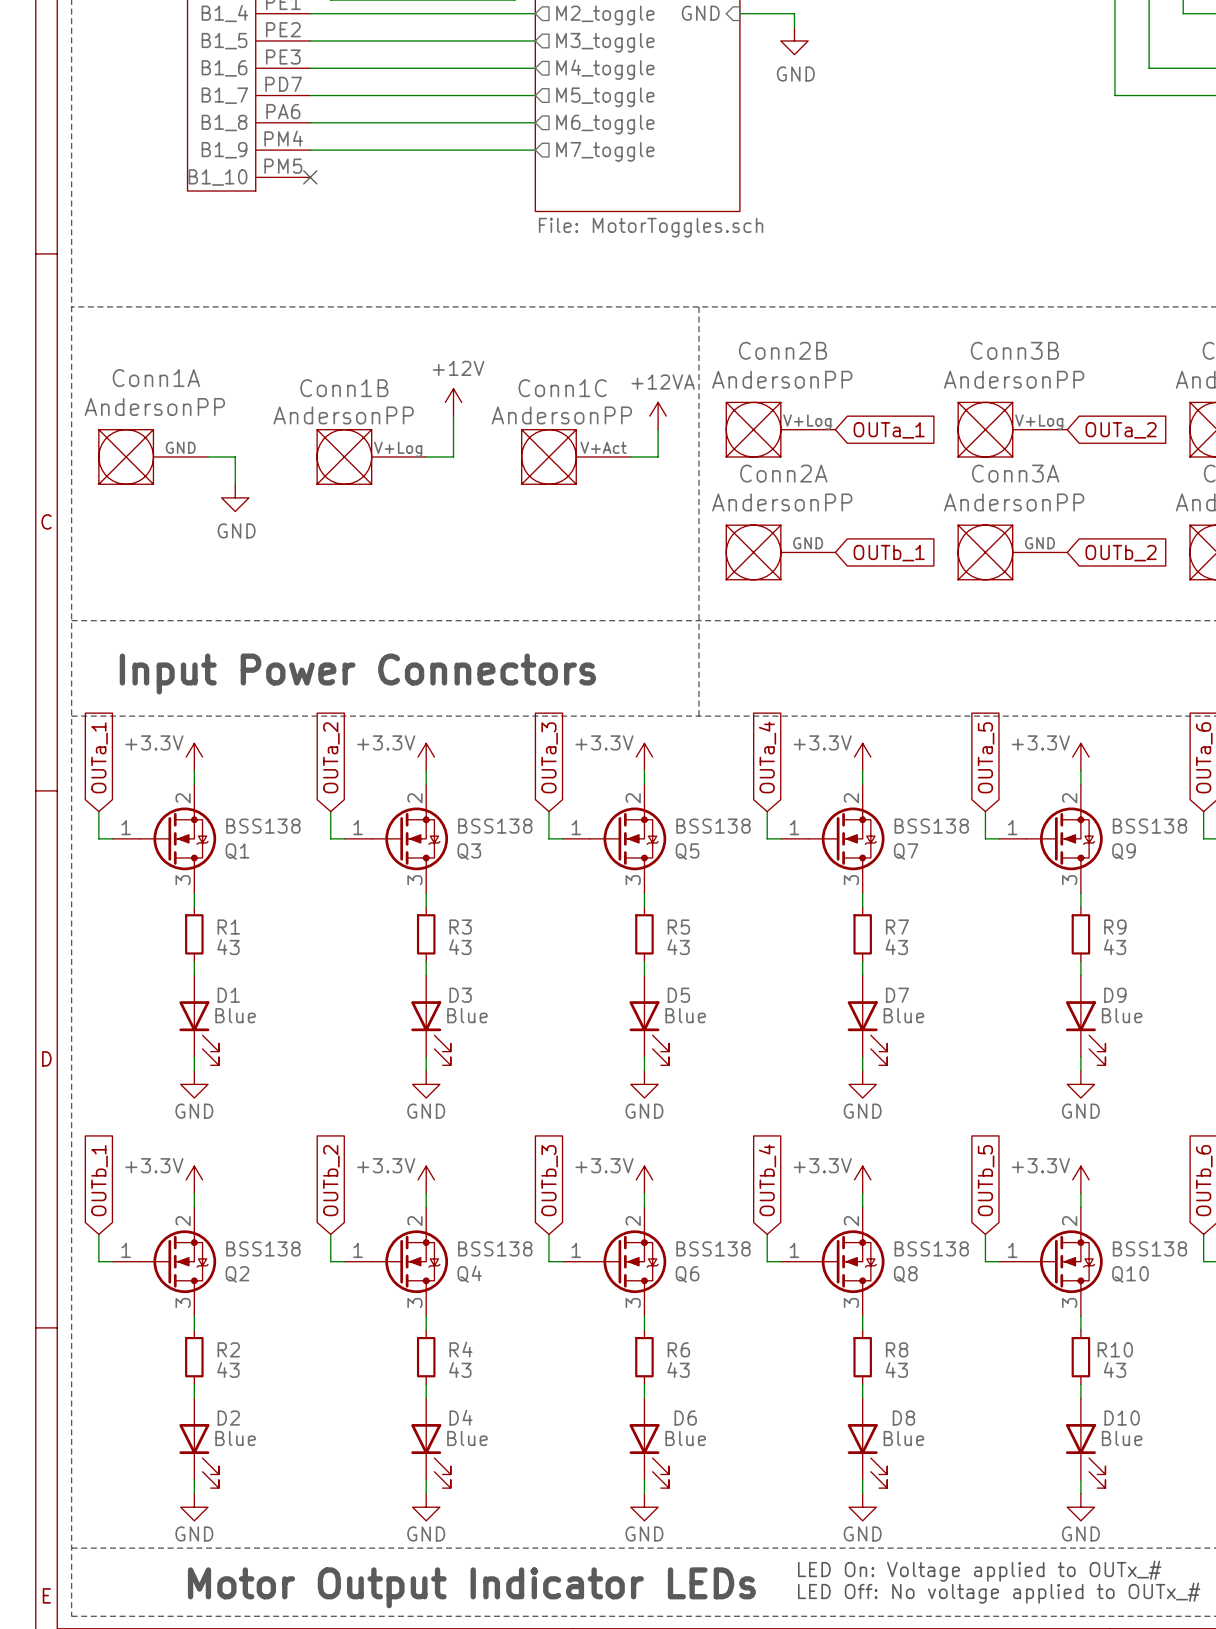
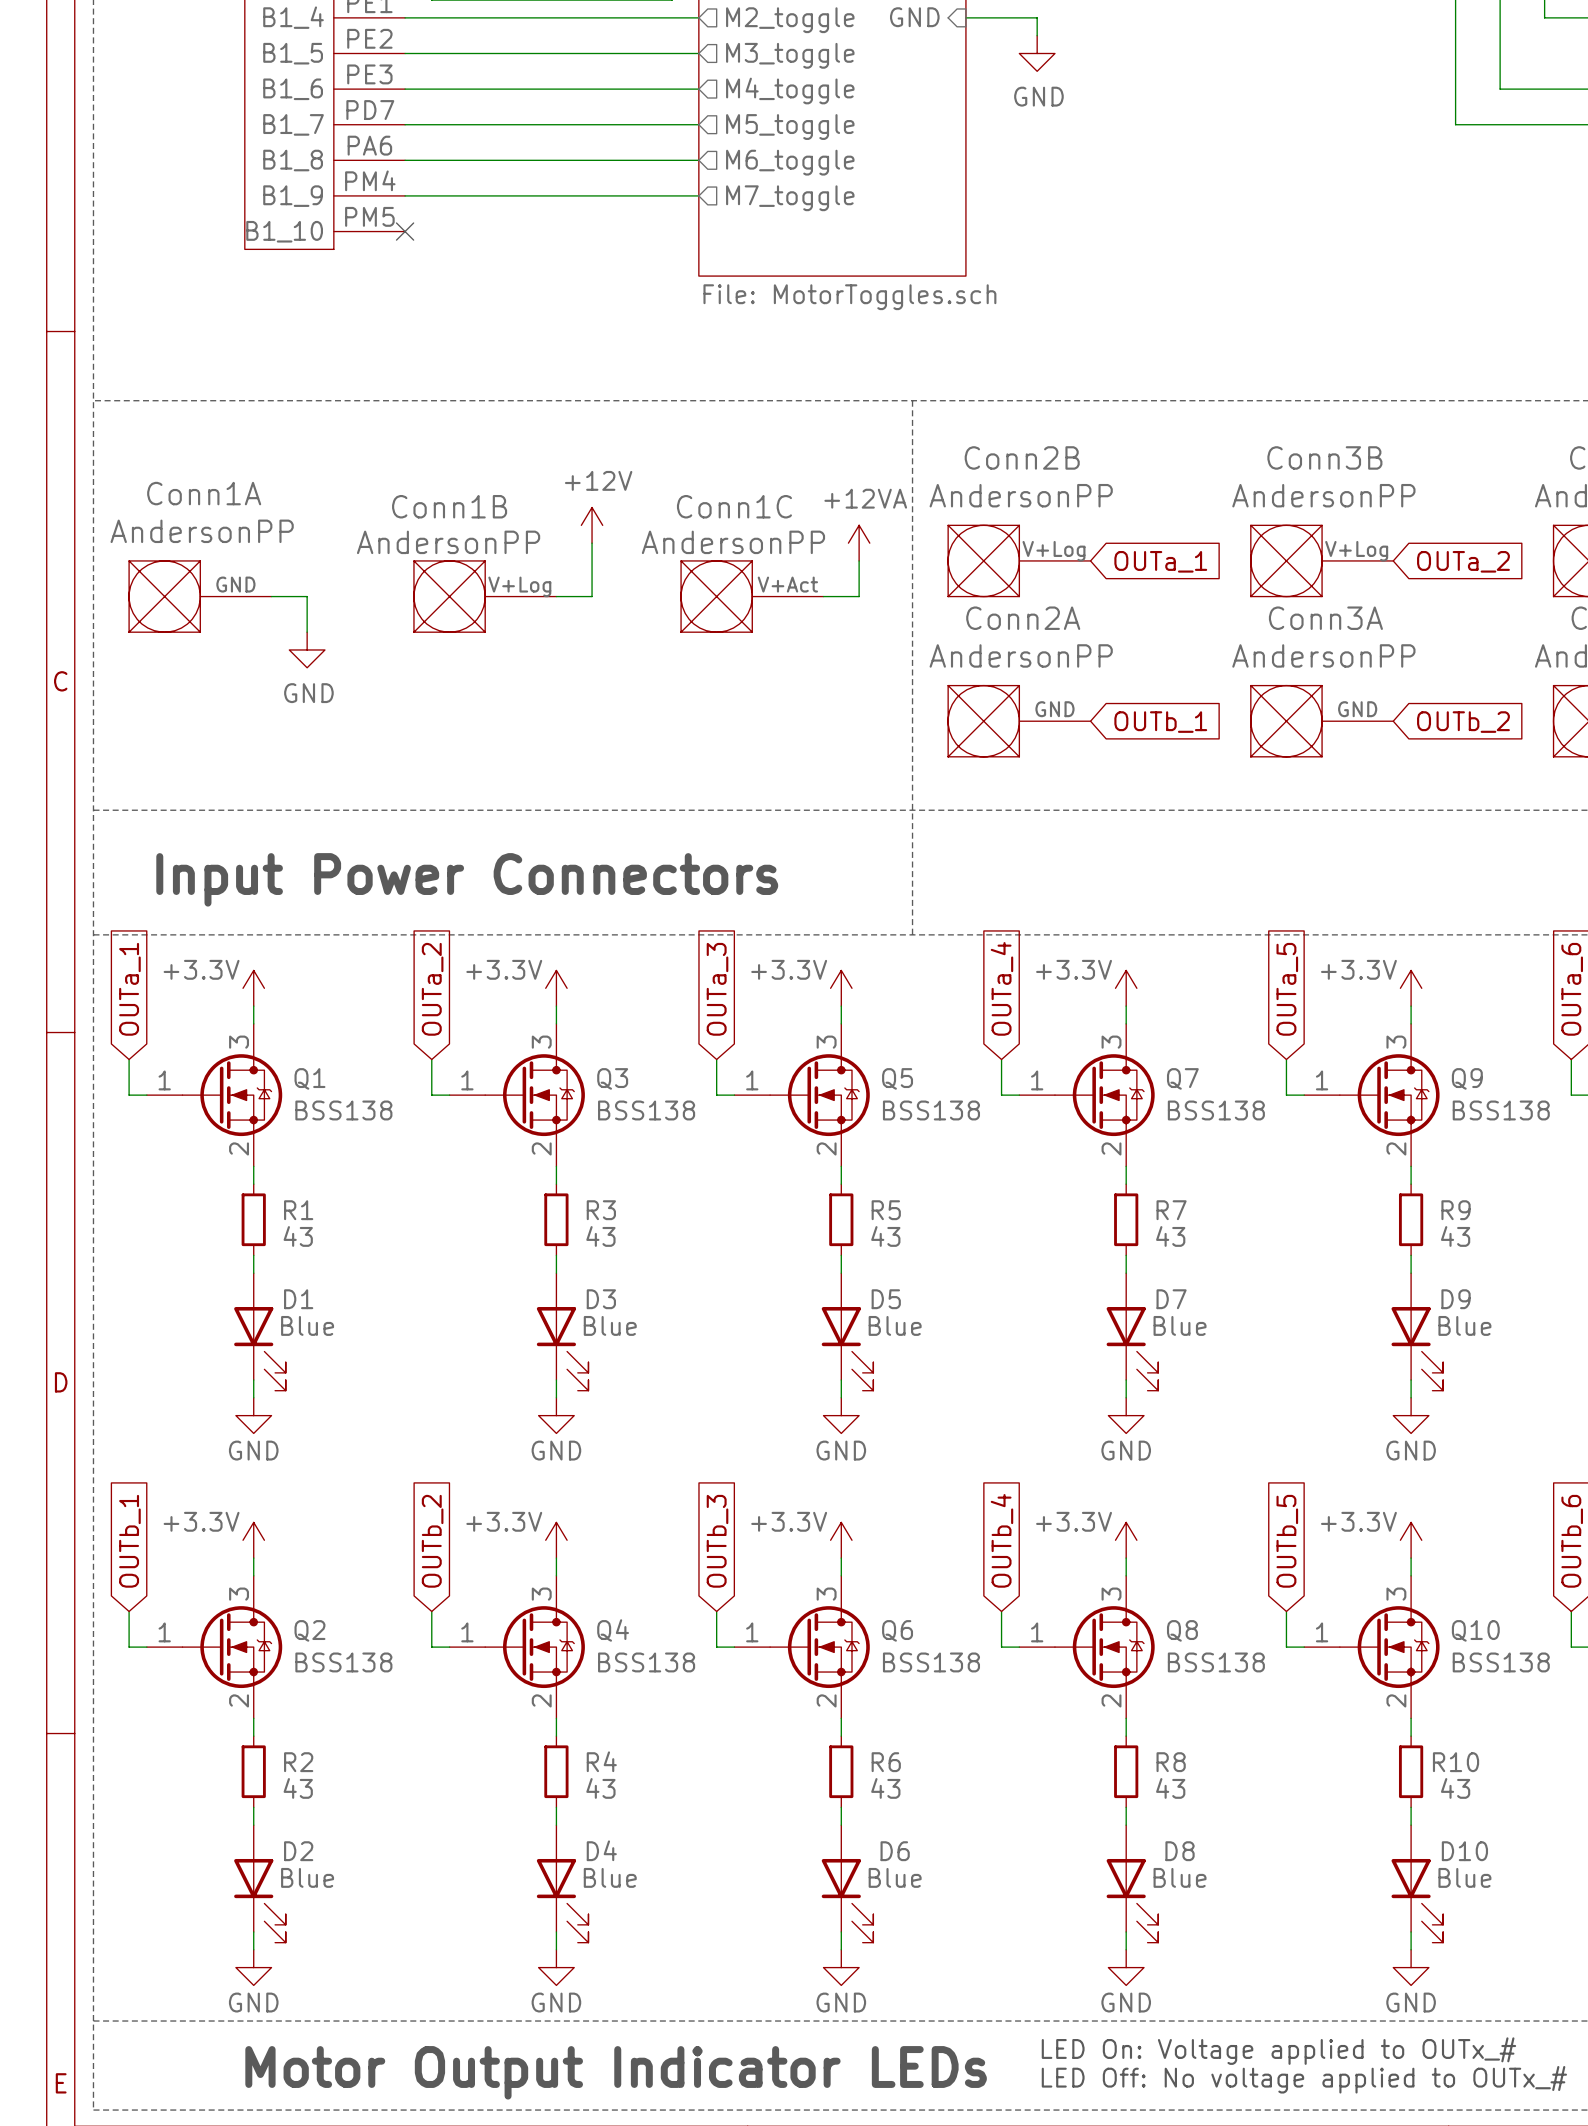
Q1 flip: as is (177, 838) -> up-down (232, 1095)
Q3 flip: as is (409, 838) -> up-down (535, 1095)
Q5 flip: as is (628, 838) -> up-down (819, 1095)
Q7 flip: as is (846, 838) -> up-down (1104, 1095)
Q9 flip: as is (1064, 838) -> up-down (1389, 1095)
Q2 flip: as is (177, 1261) -> up-down (232, 1647)
Q4 flip: as is (409, 1261) -> up-down (535, 1647)
Q6 flip: as is (628, 1261) -> up-down (819, 1647)
Q8 flip: as is (846, 1261) -> up-down (1104, 1647)
Q10 flip: as is (1064, 1261) -> up-down (1389, 1647)

